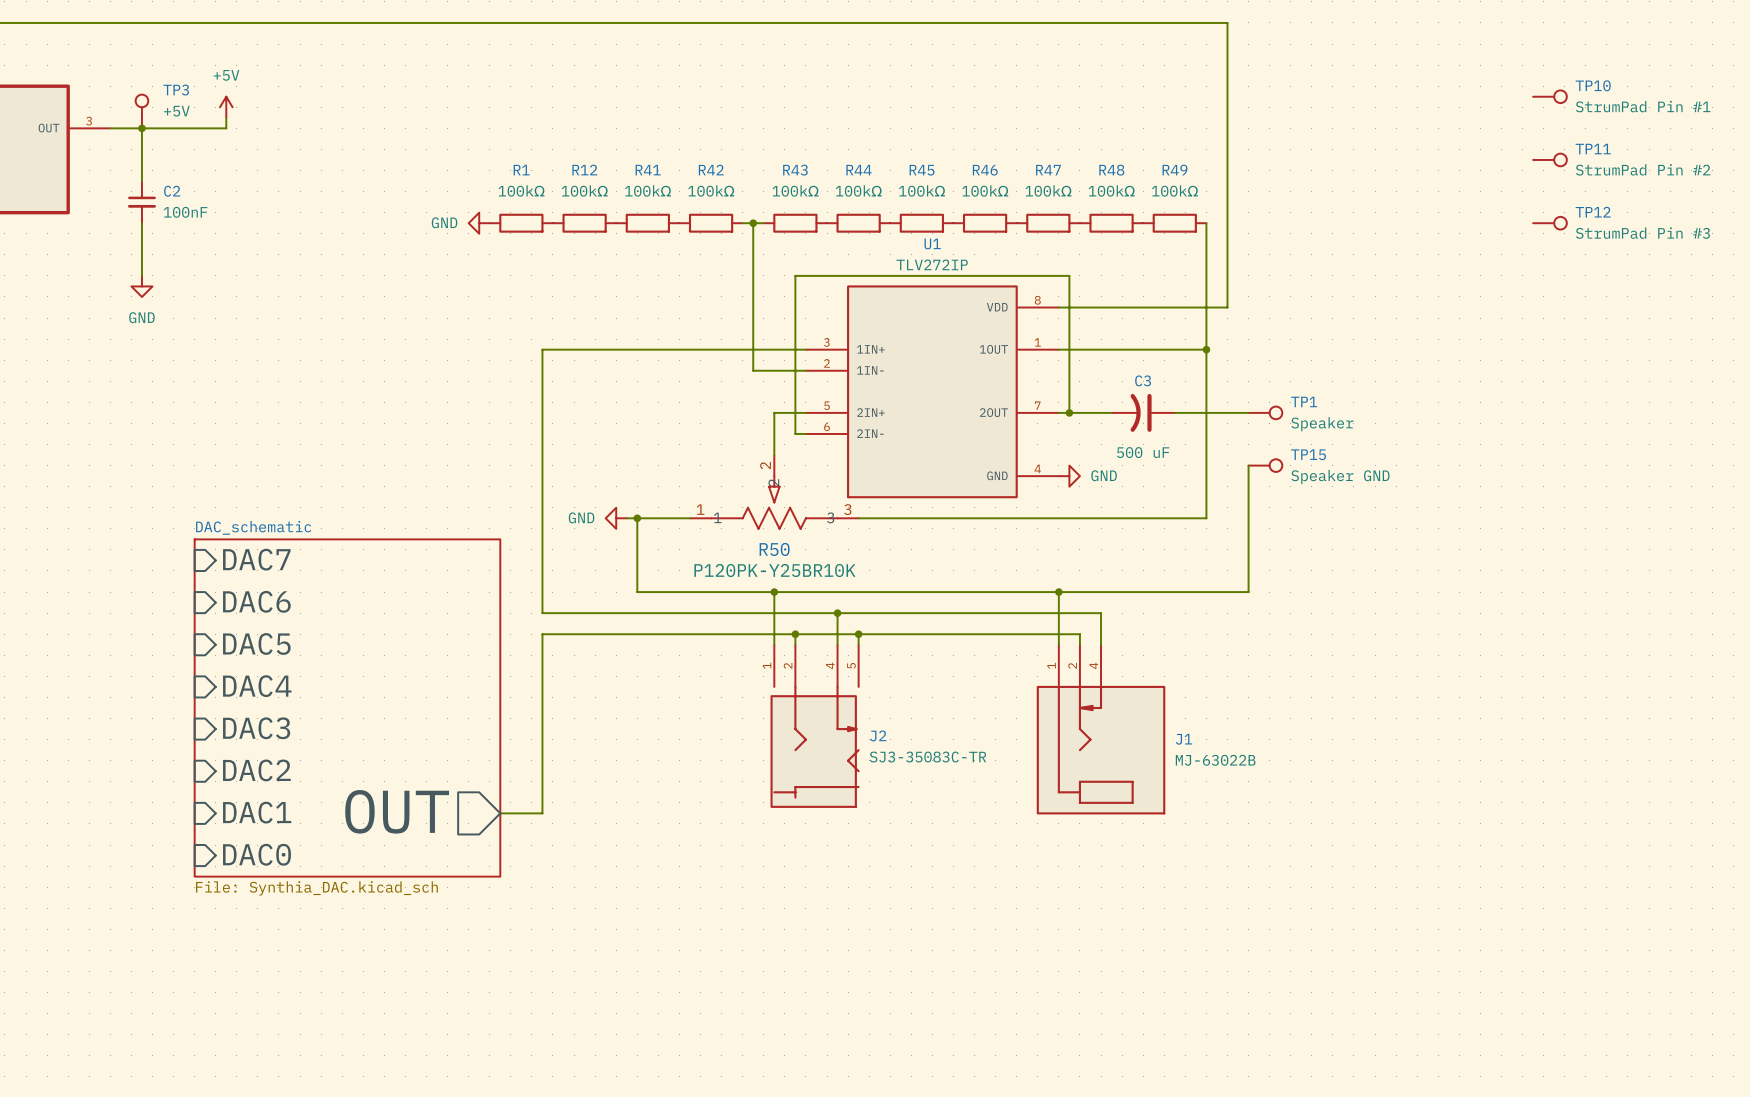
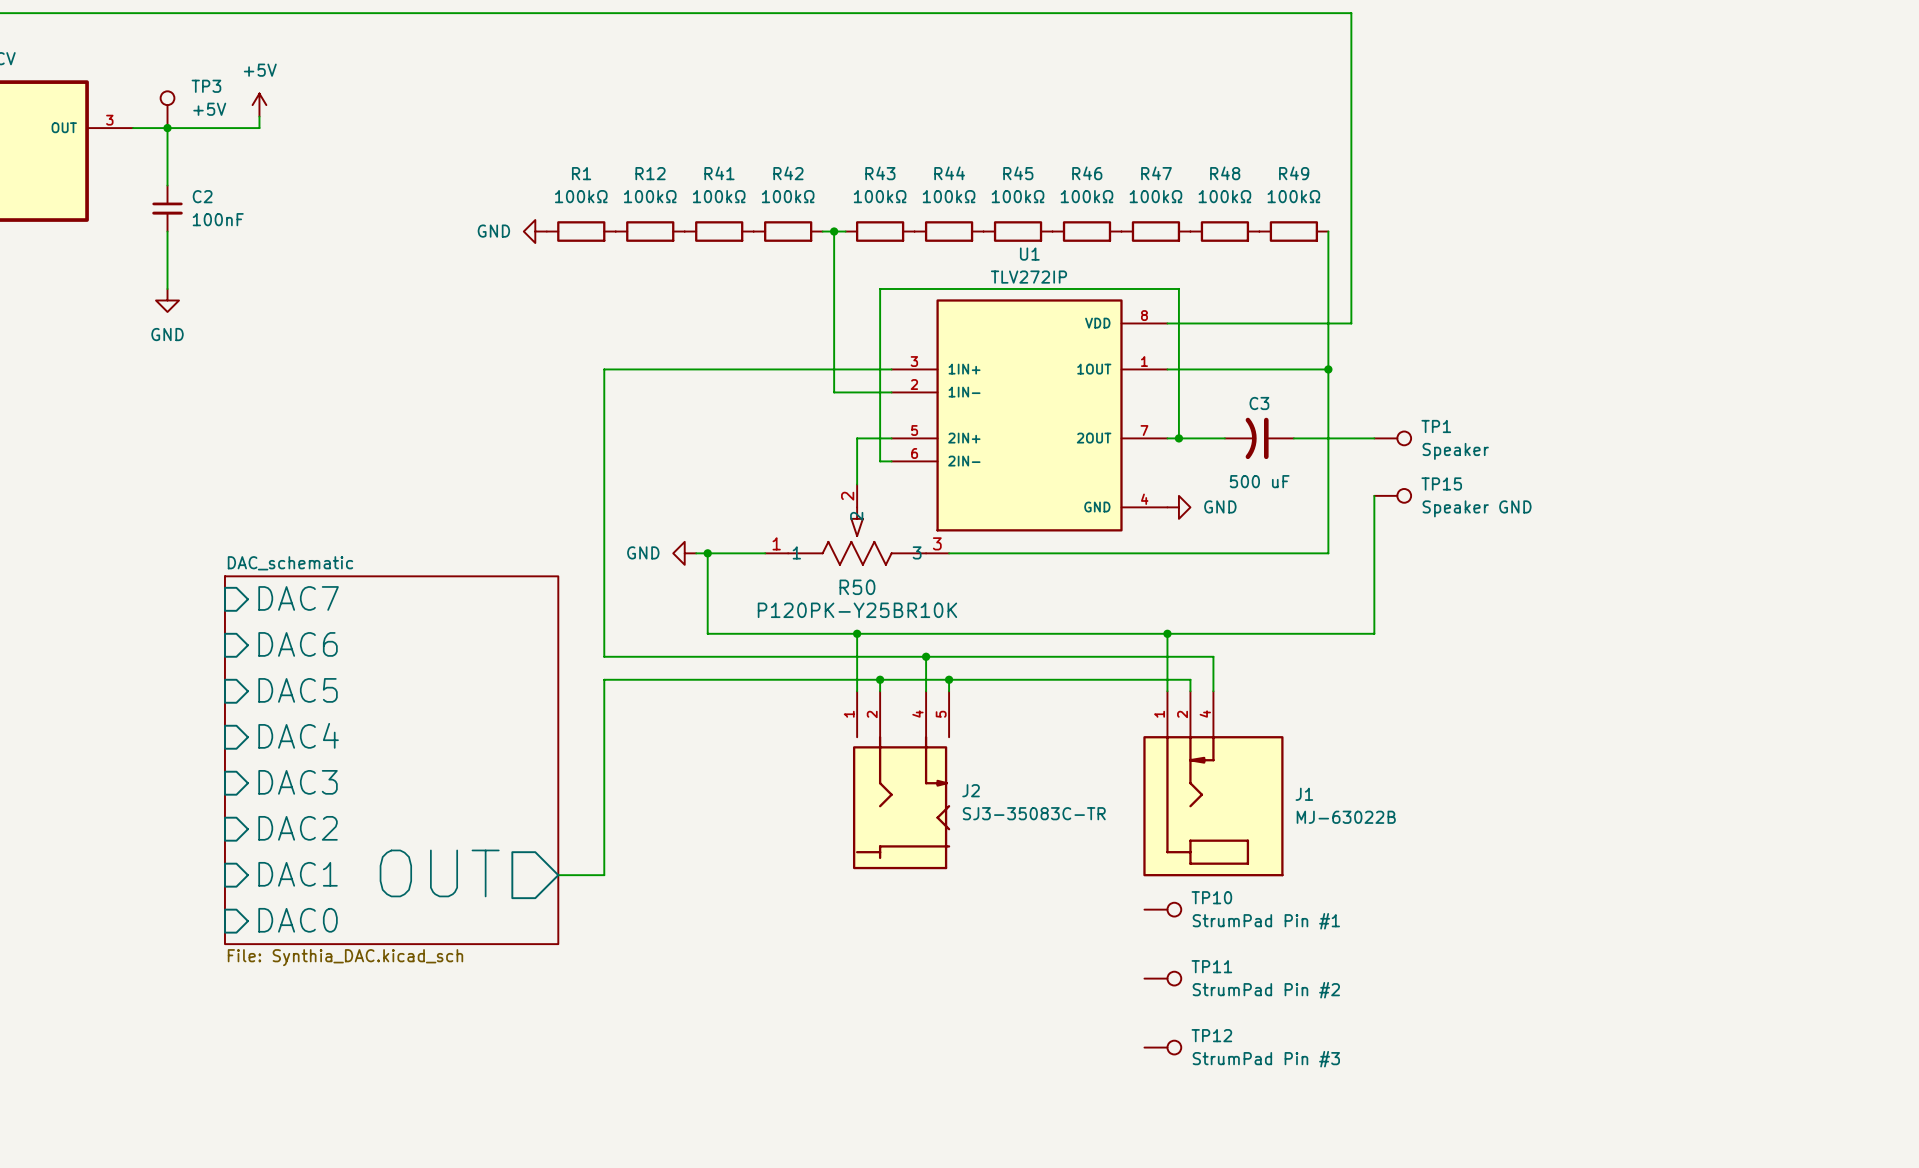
TP10 position: (1549, 96) -> (1162, 909)
TP11 position: (1549, 159) -> (1162, 978)
TP12 position: (1549, 223) -> (1162, 1047)

